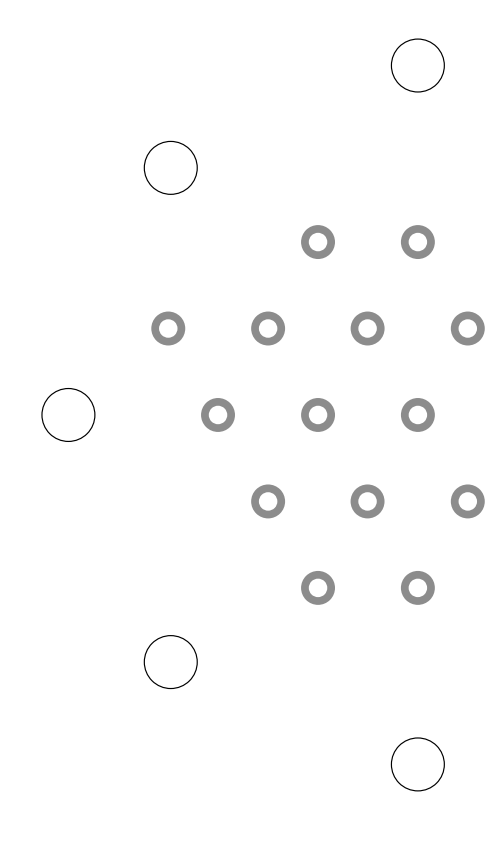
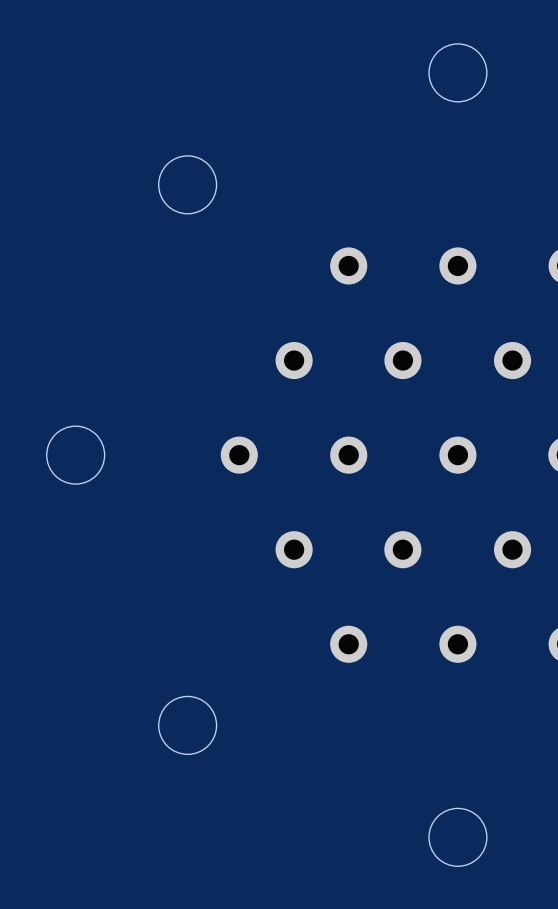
part: (168, 328) -> none

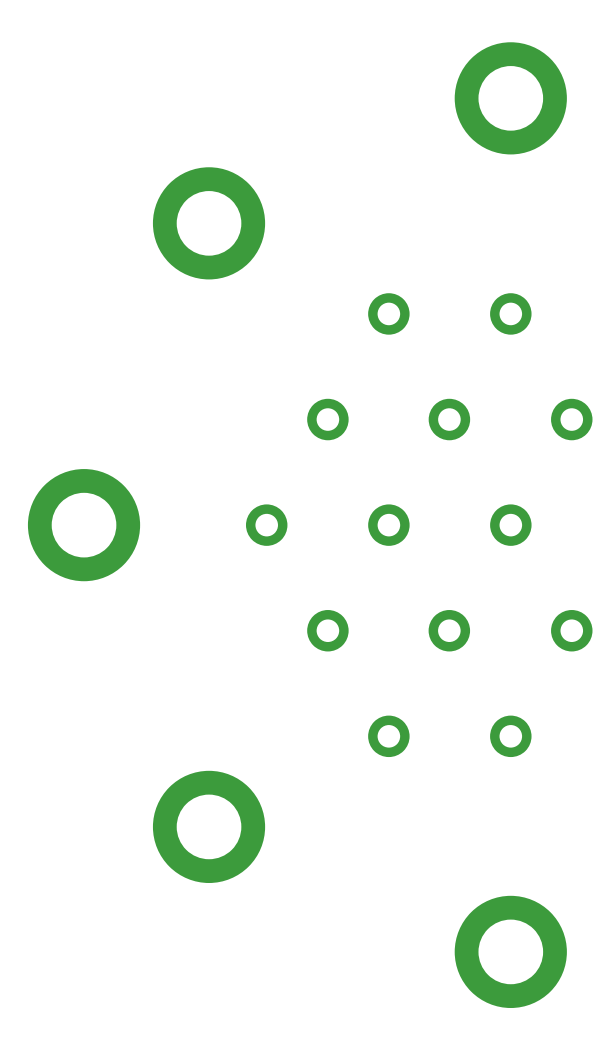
round board edge: [428, 43, 487, 102] -> none
part: none -> (510, 98)
round board edge: [158, 155, 217, 214] -> none
part: none -> (209, 223)
round board edge: [46, 426, 105, 485] -> none
part: none -> (84, 525)
round board edge: [158, 696, 217, 755] -> none
part: none -> (209, 826)
round board edge: [428, 808, 487, 867] -> none
part: none -> (510, 951)

